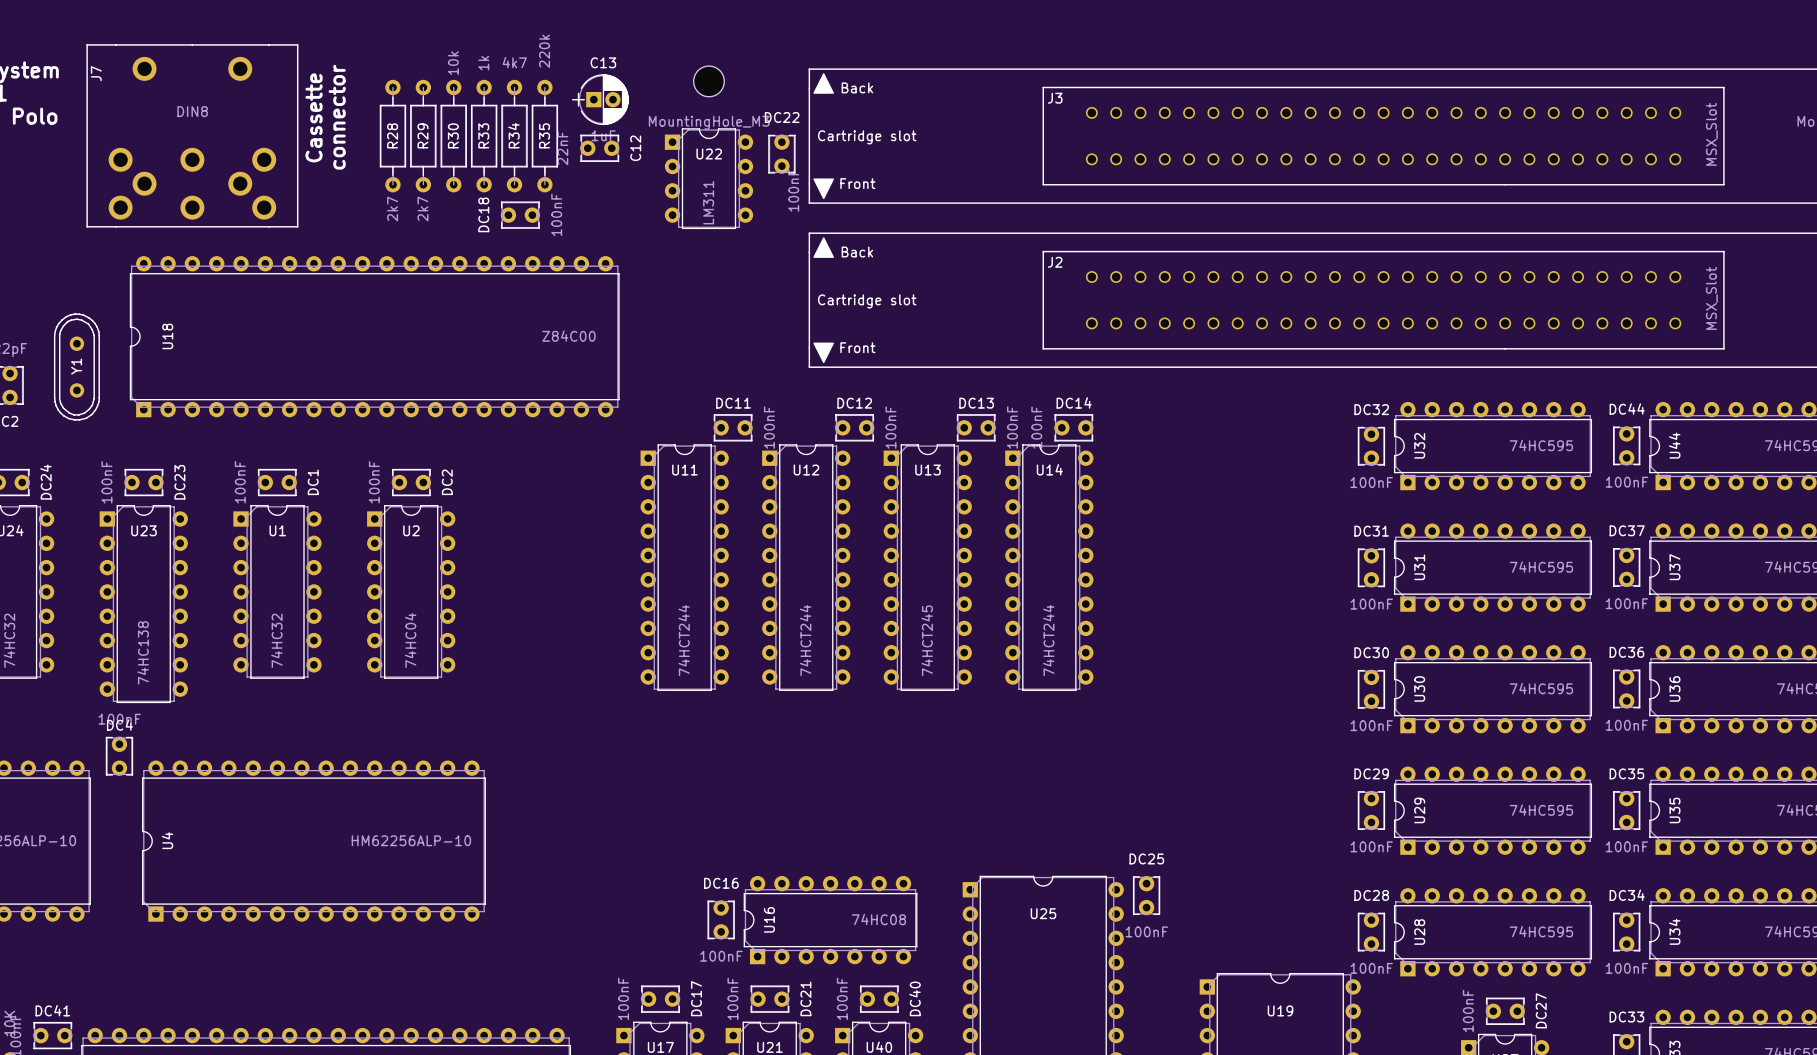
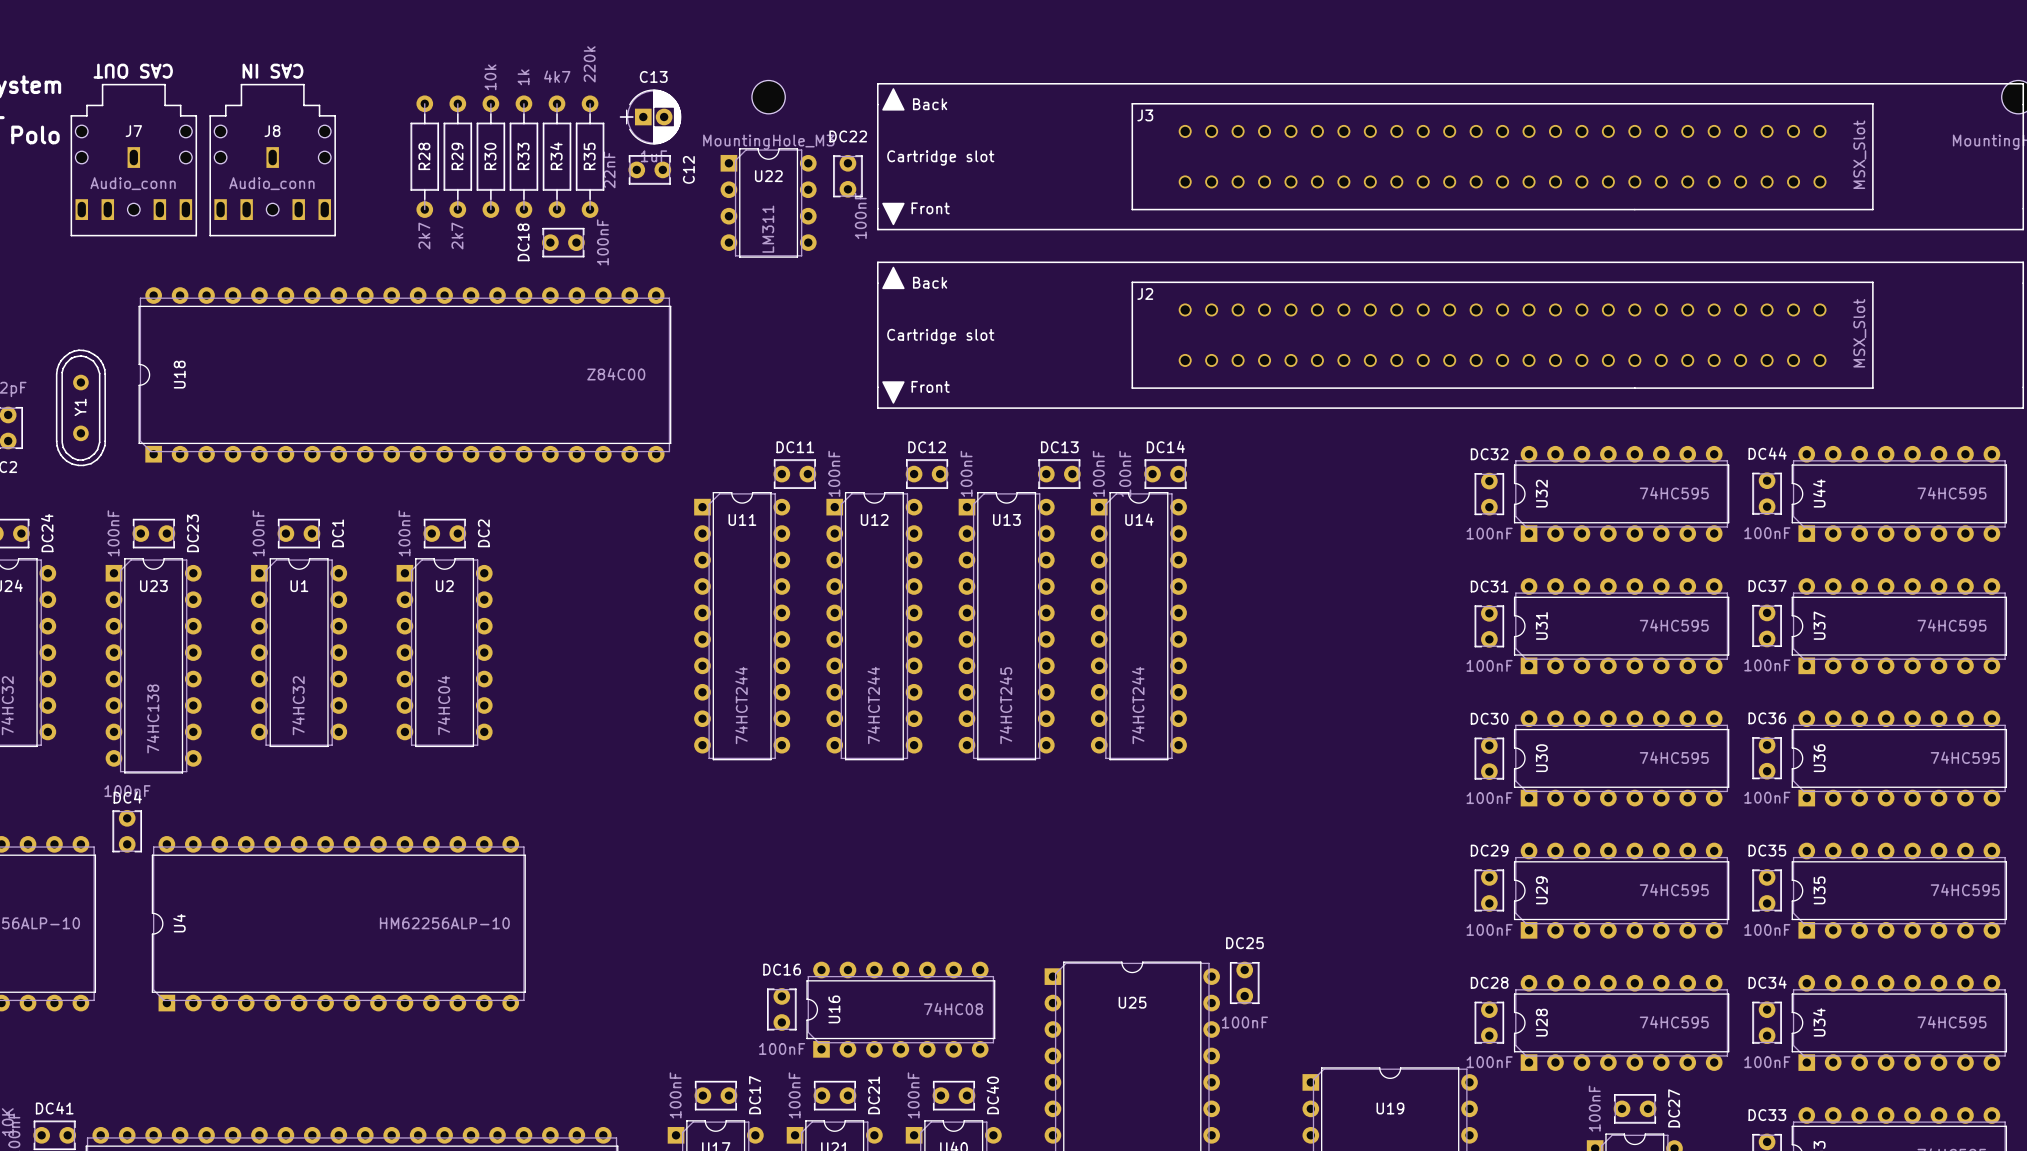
J7 footprint: [86, 44, 299, 228] -> [70, 83, 198, 237]
text: none -> CAS OUT (133, 71)
text: none -> CAS IN (272, 71)
J7 name position: J7 (96, 73) -> J7 (133, 131)
J7 value: DIN8 (192, 111) -> Audio_conn (133, 183)
text: Cassette (314, 117) -> none
text: connector (337, 117) -> none
J8: none -> Audio_conn (272, 160)

